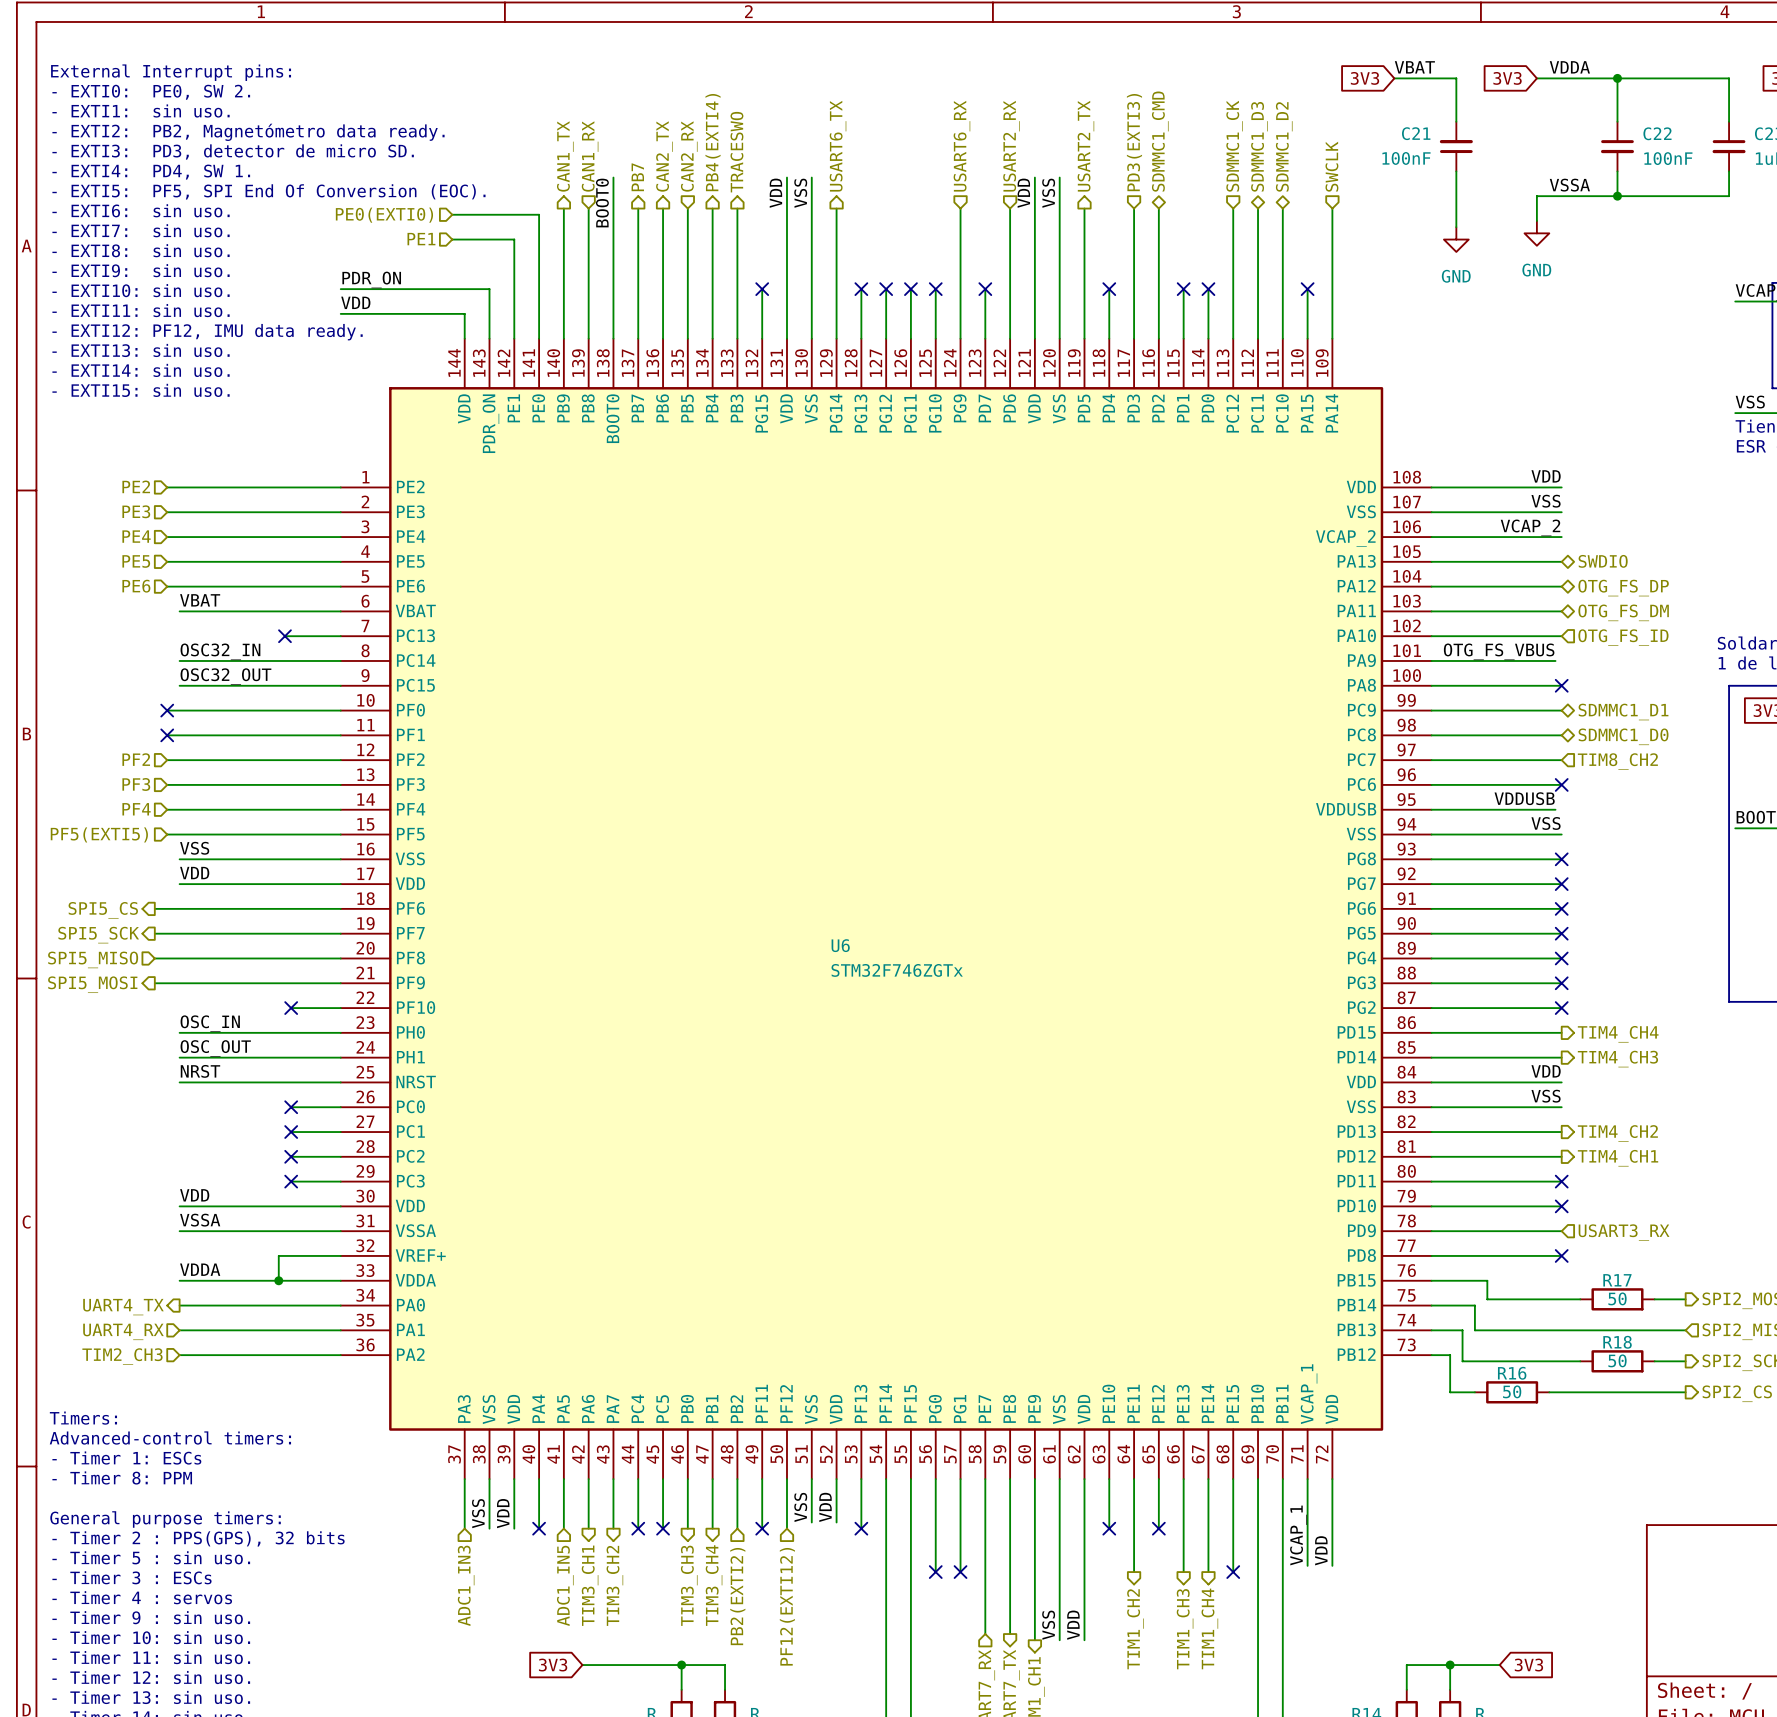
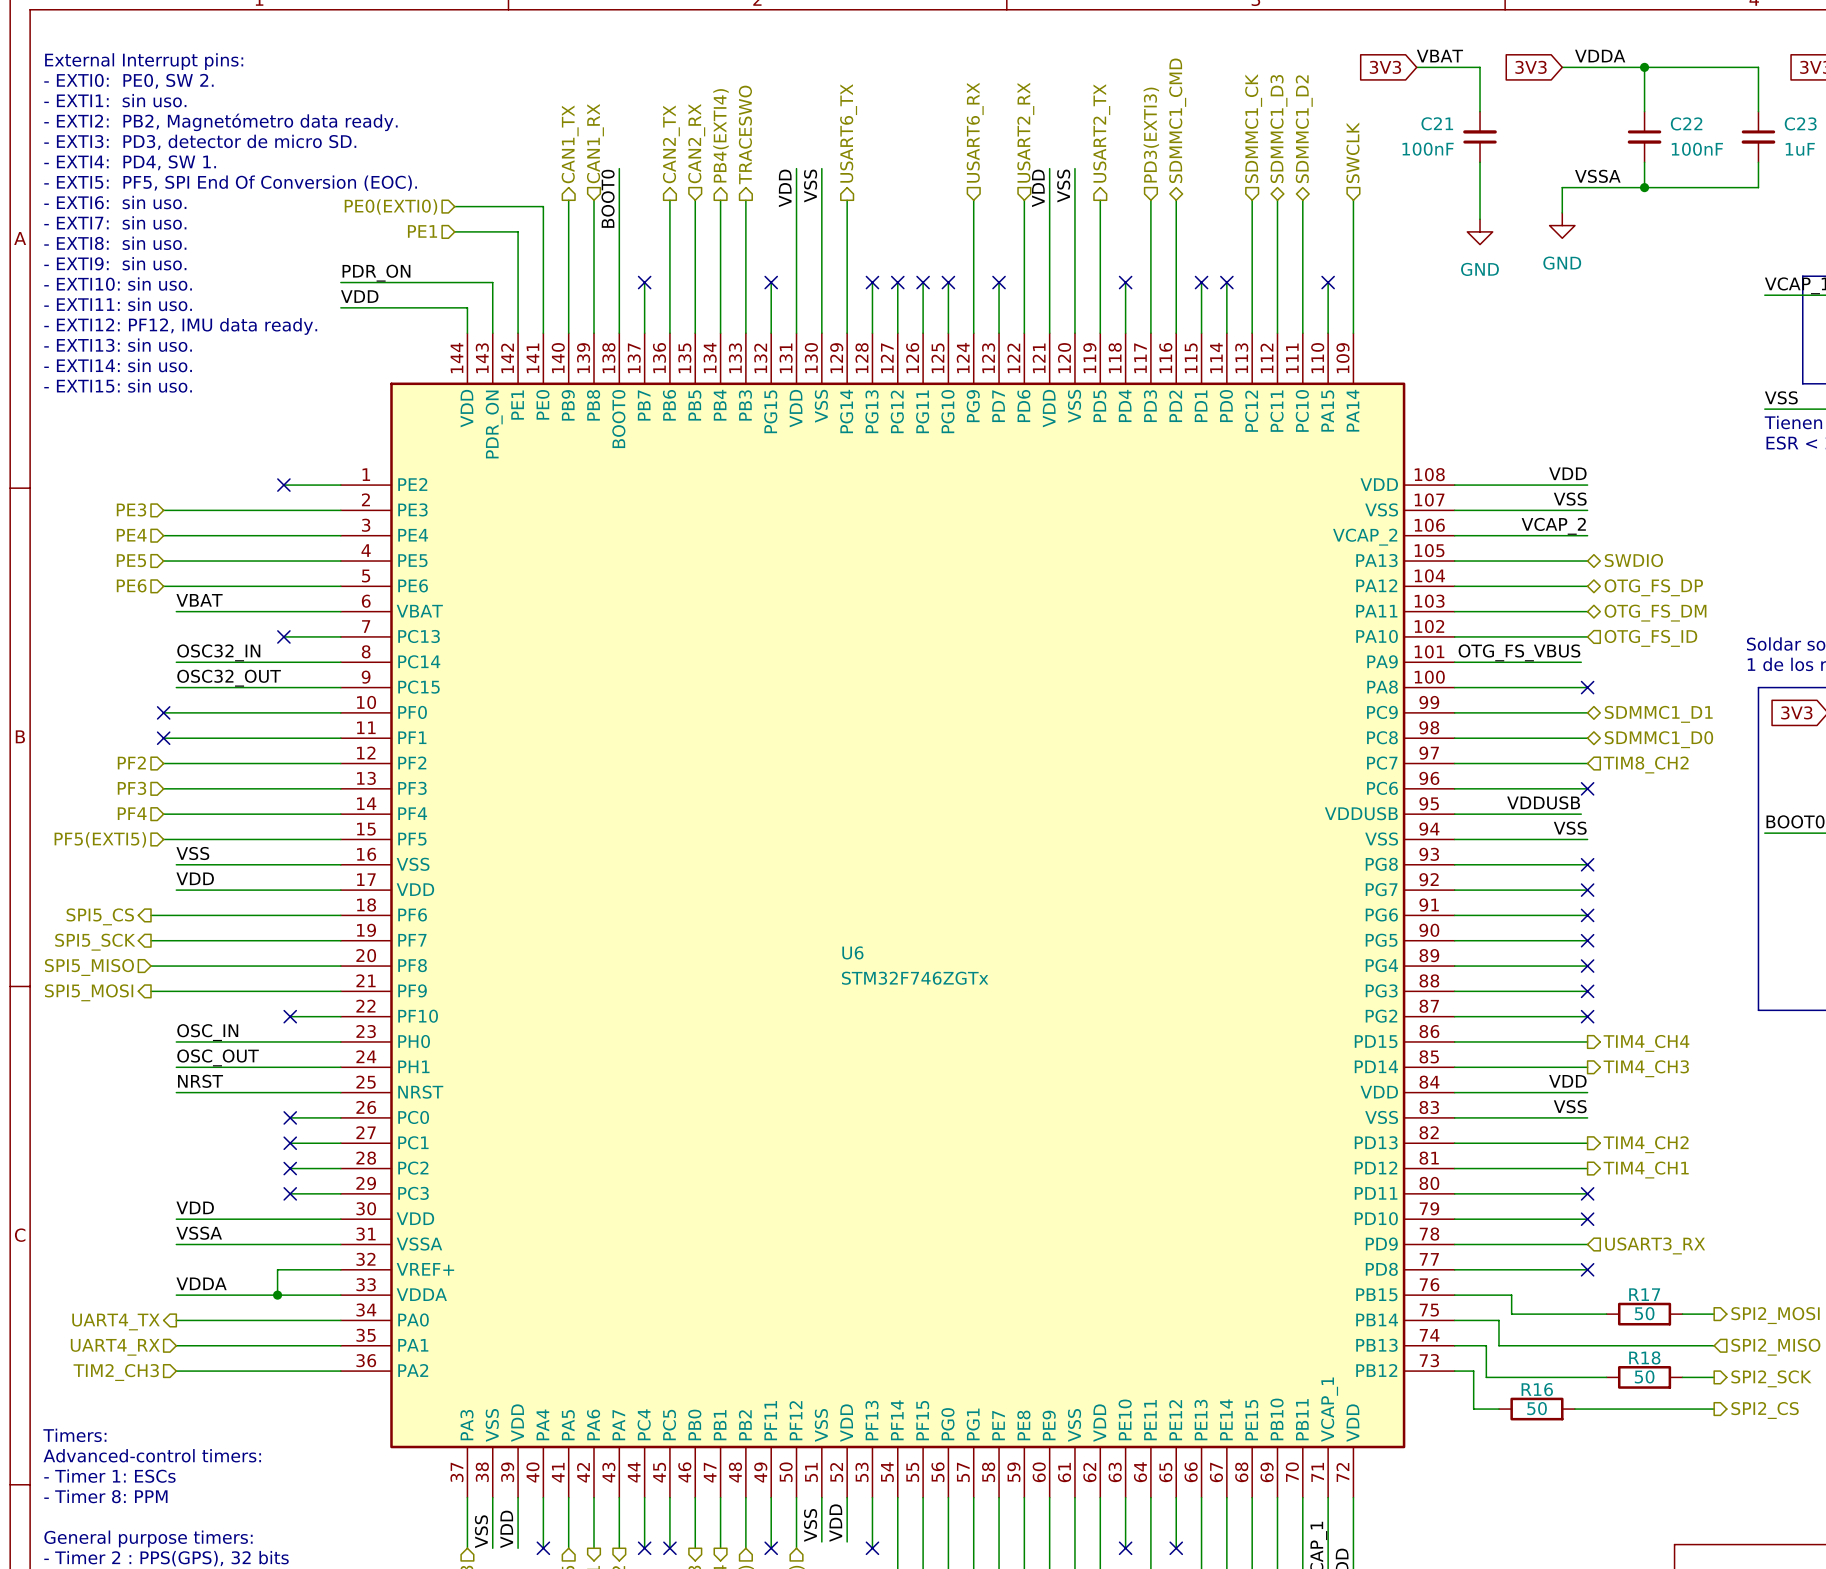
hierarchical label: PB7 (637, 177) -> none
wire: (638, 208) (638, 289) -> none
no-connect mark: none -> (644, 282)
hierarchical label: PE2 (136, 486) -> none
wire: (167, 487) (284, 487) -> none
no-connect mark: none -> (283, 485)

